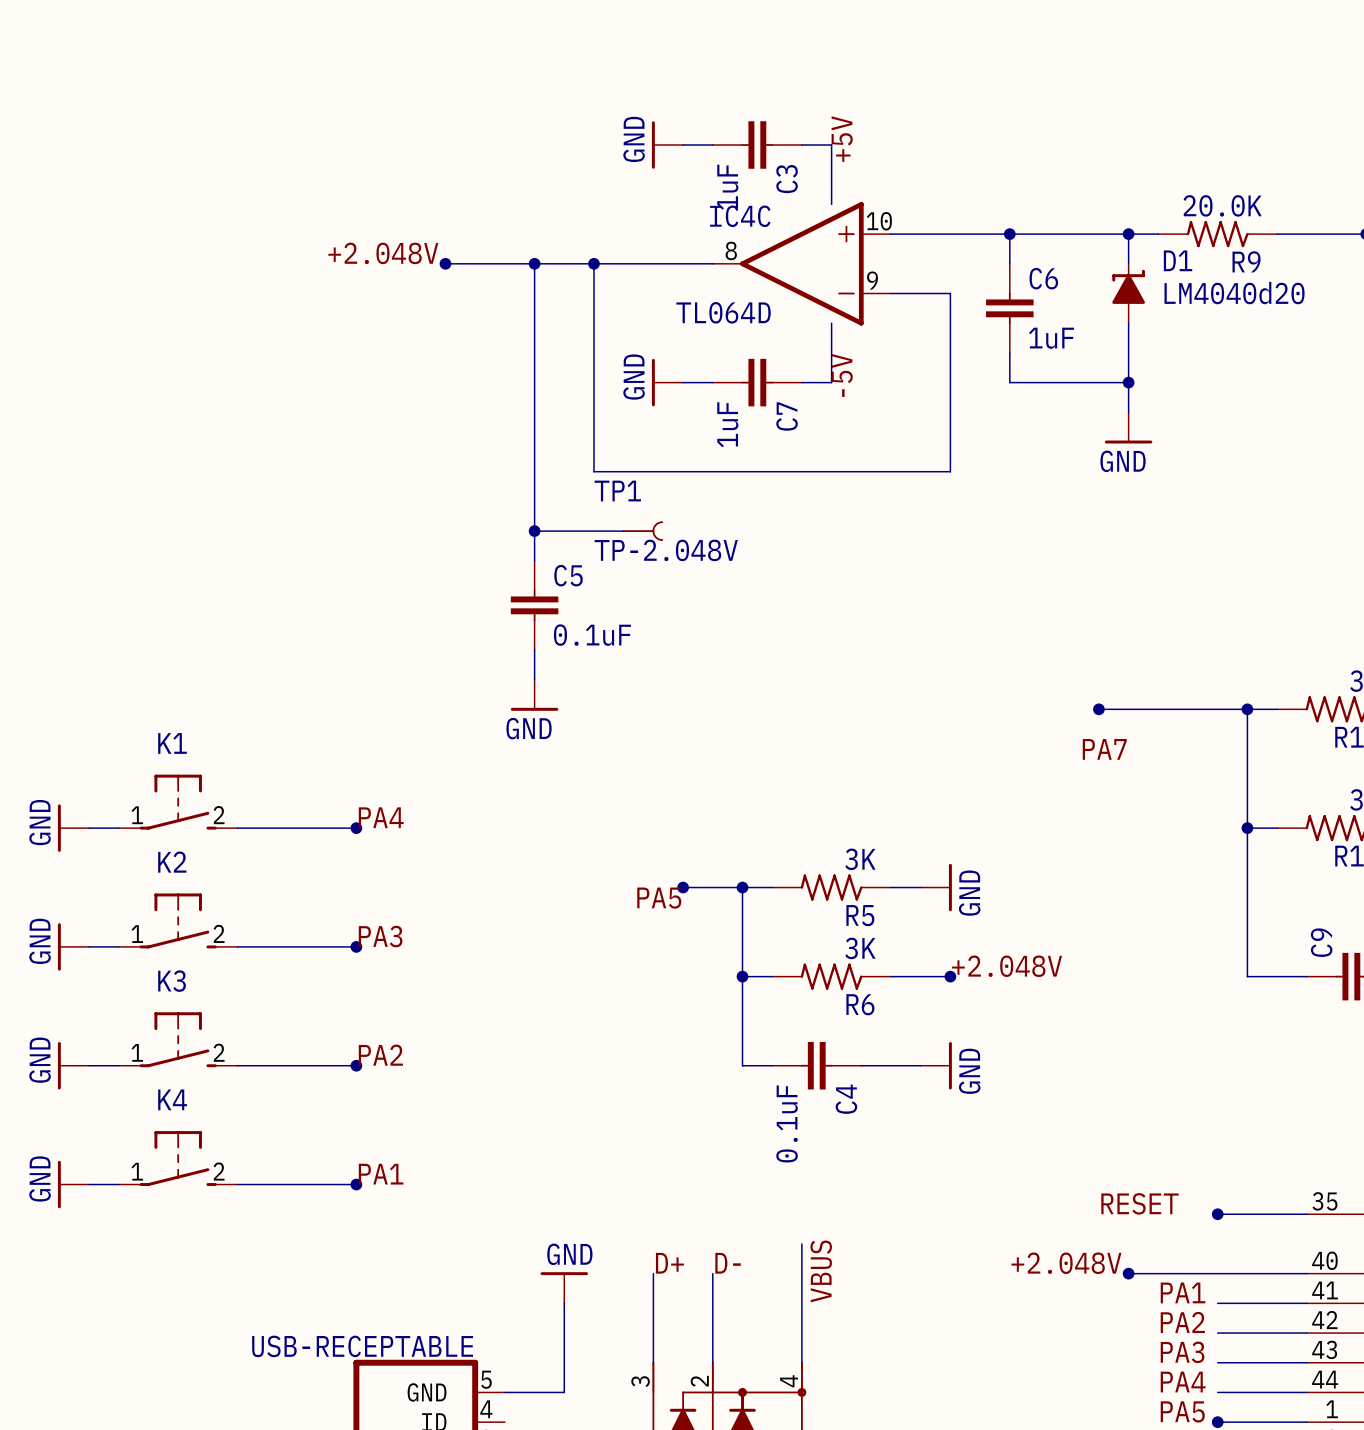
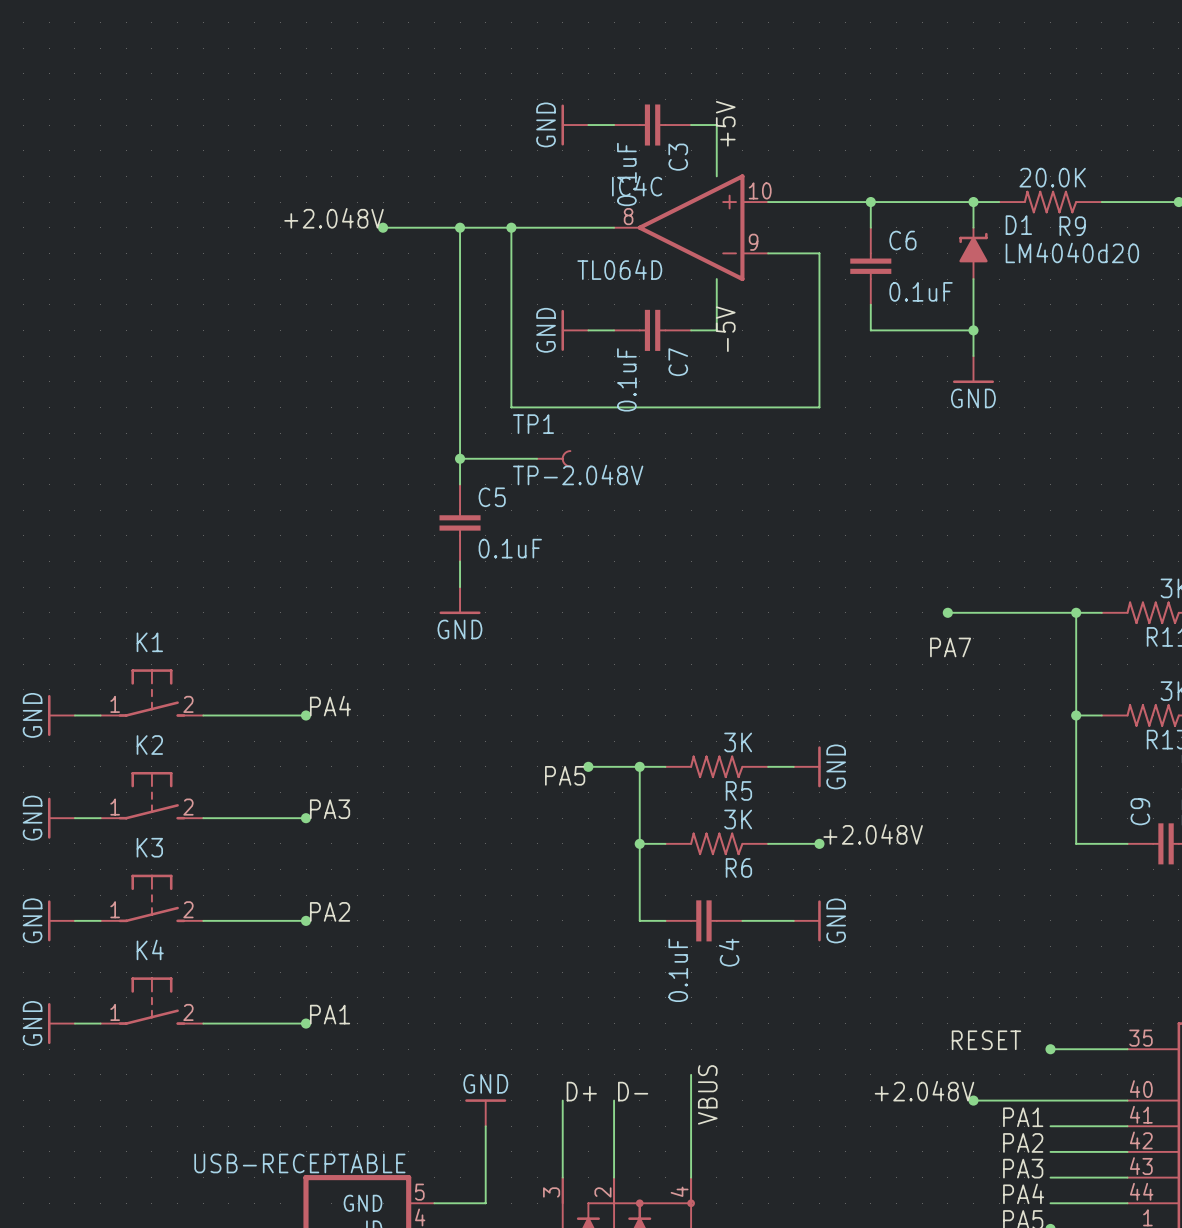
C3 value: 1uF (727, 187) -> 0.1uF (626, 174)
C6 value: 1uF (1051, 338) -> 0.1uF (921, 291)
C7 value: 1uF (727, 424) -> 0.1uF (626, 379)

